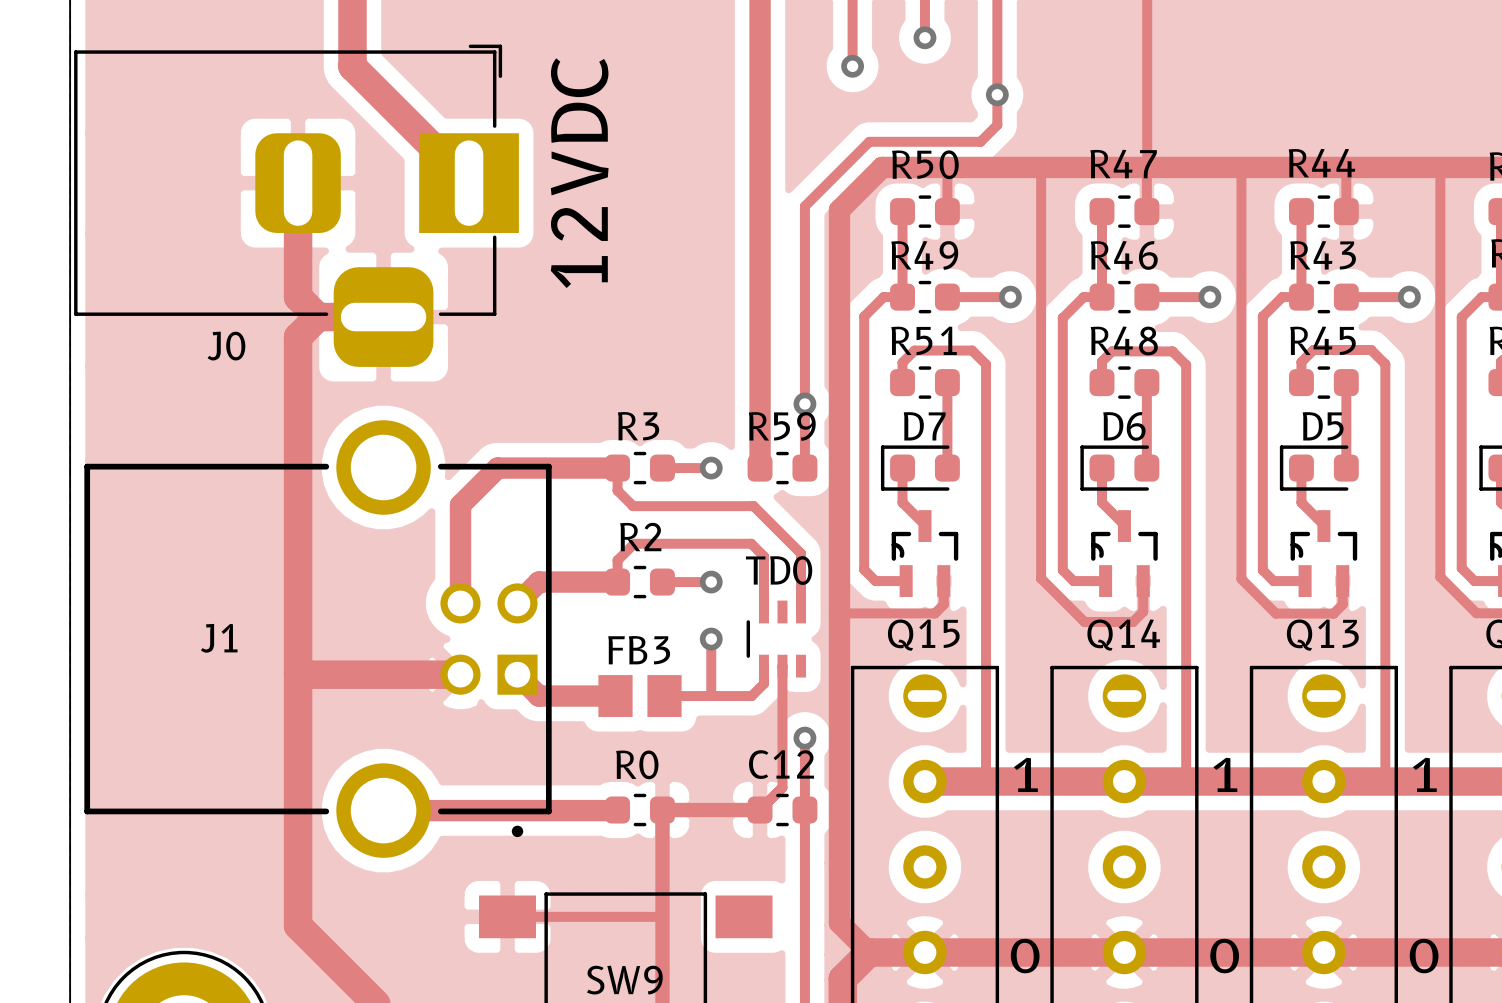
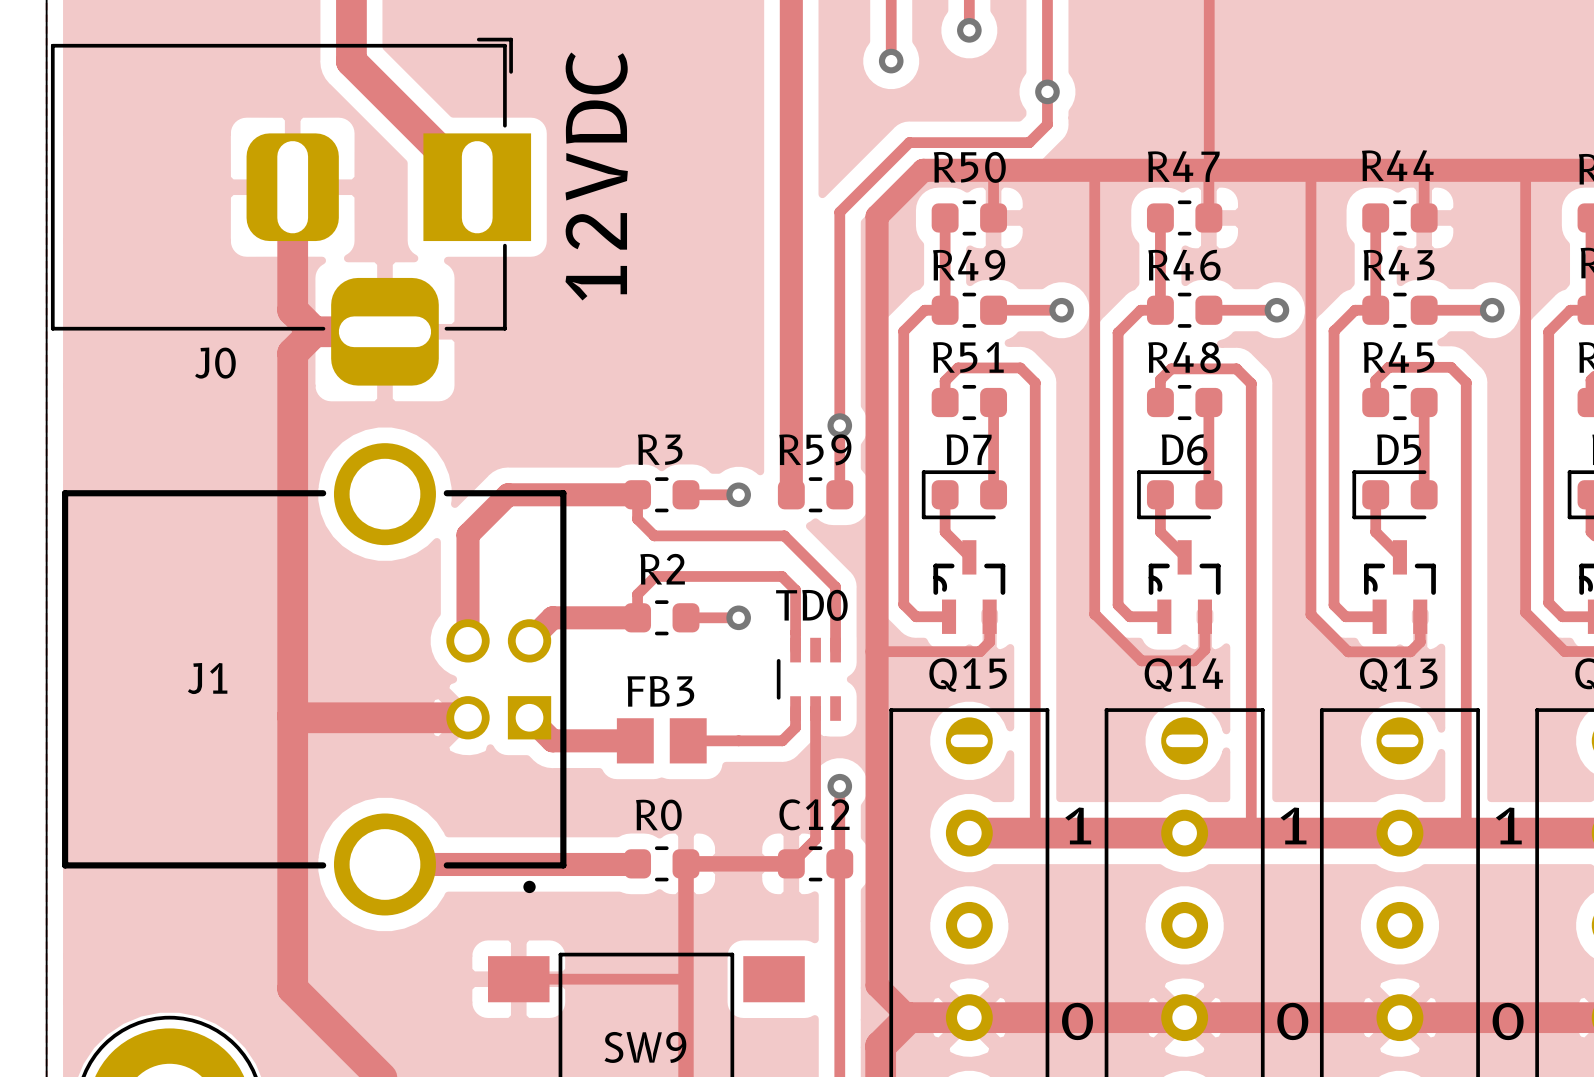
track: (711, 639) (711, 696) -> none
via: (711, 639) -> none

